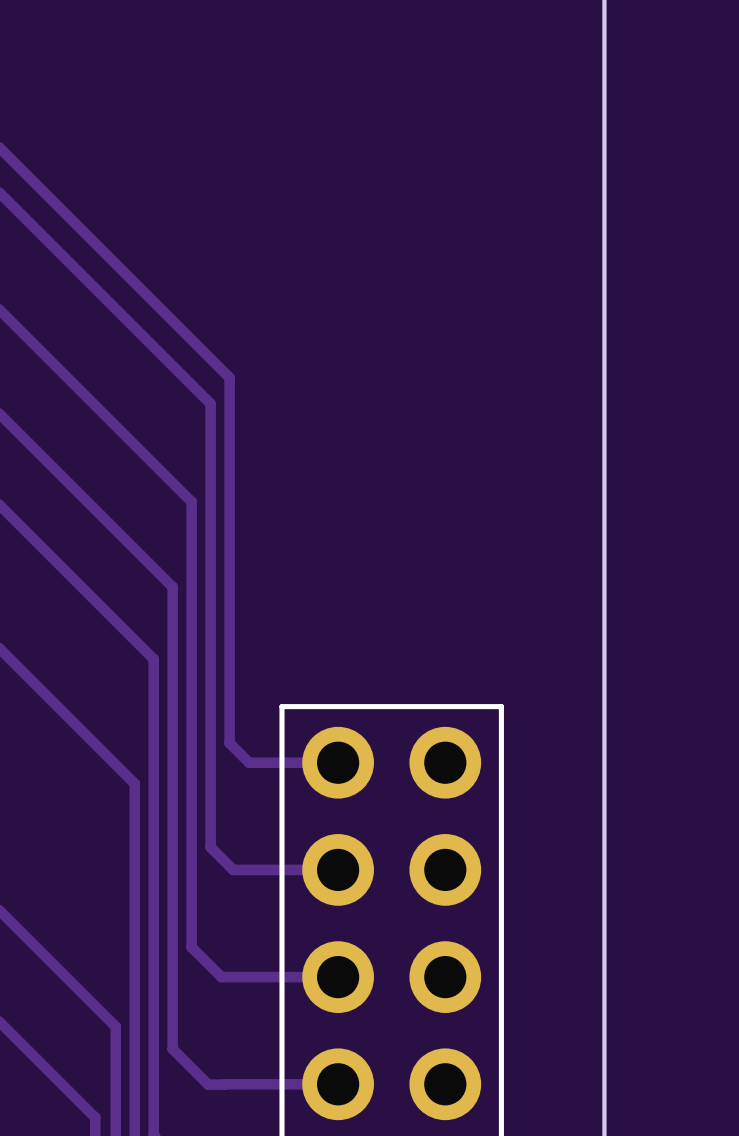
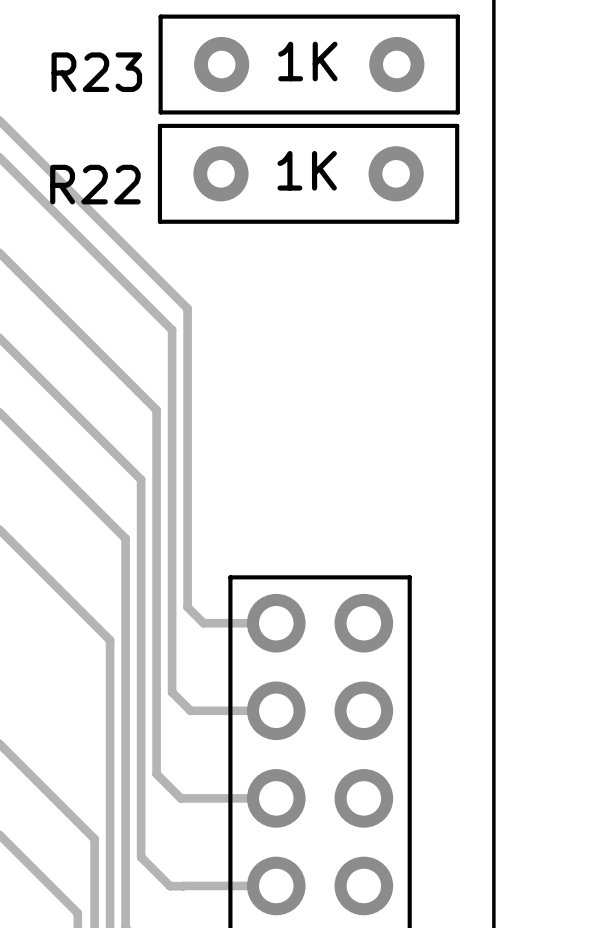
R23: none -> 1K (309, 64)
R22: none -> 1K (308, 173)

